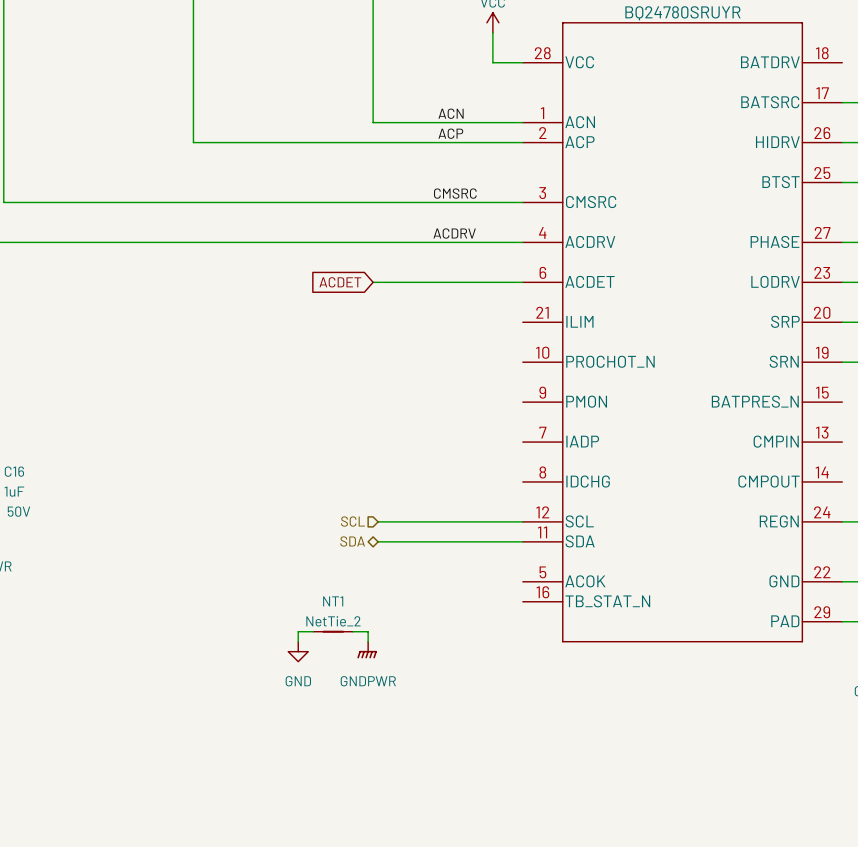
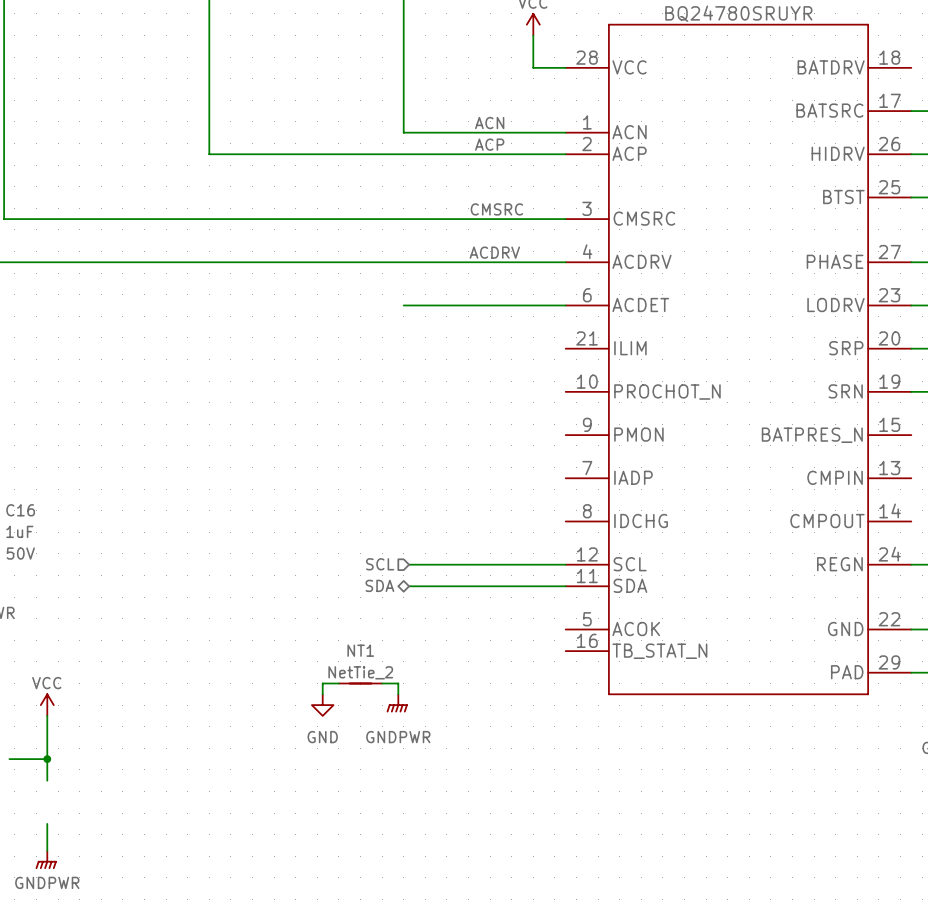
global label: ACDET (340, 282) -> none
power symbol: none -> VCC (47, 705)
wire: none -> (47, 715) (47, 780)
wire: none -> (9, 759) (47, 759)
junction: none -> (47, 759)
wire: none -> (47, 823) (47, 850)
power symbol: none -> GNDPWR (46, 859)

